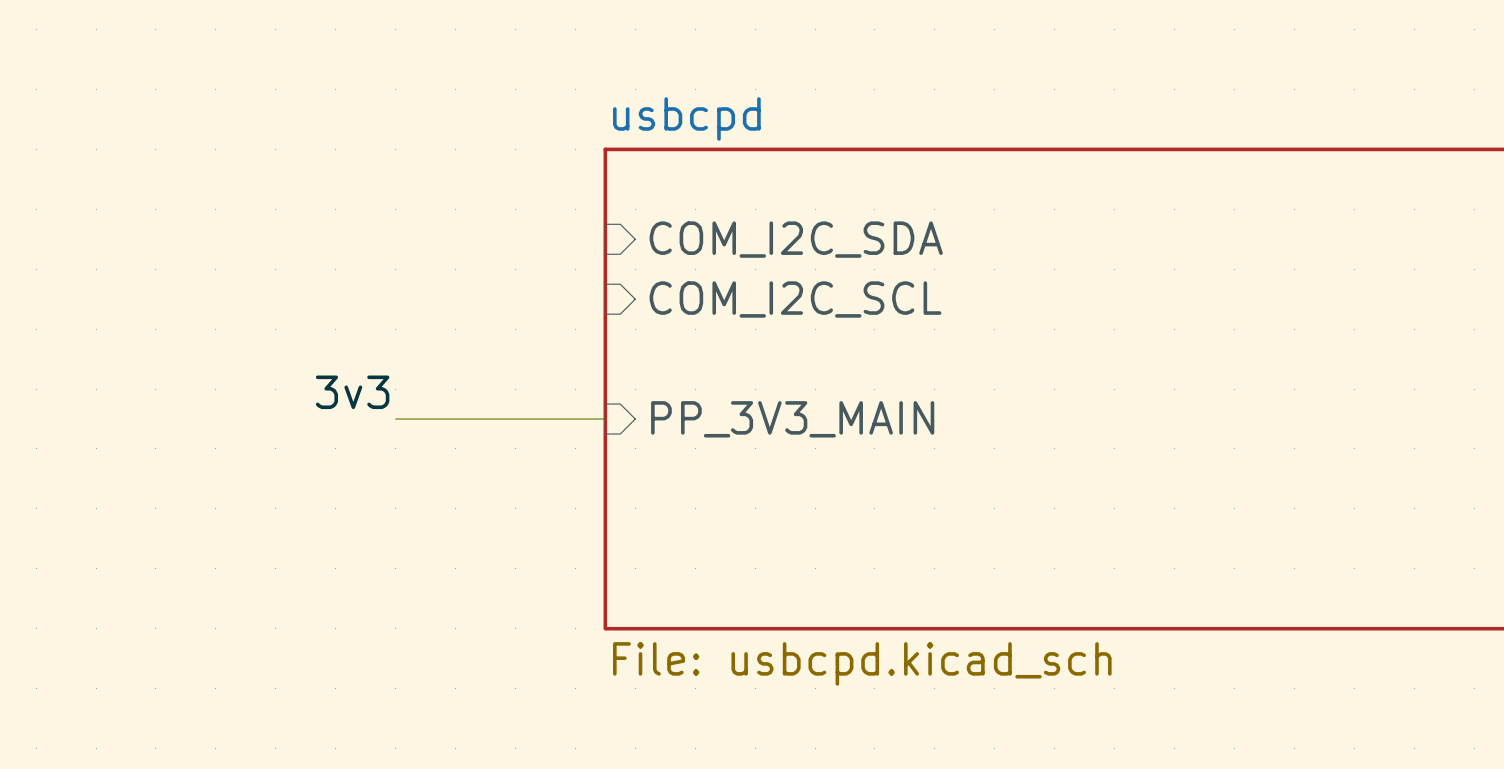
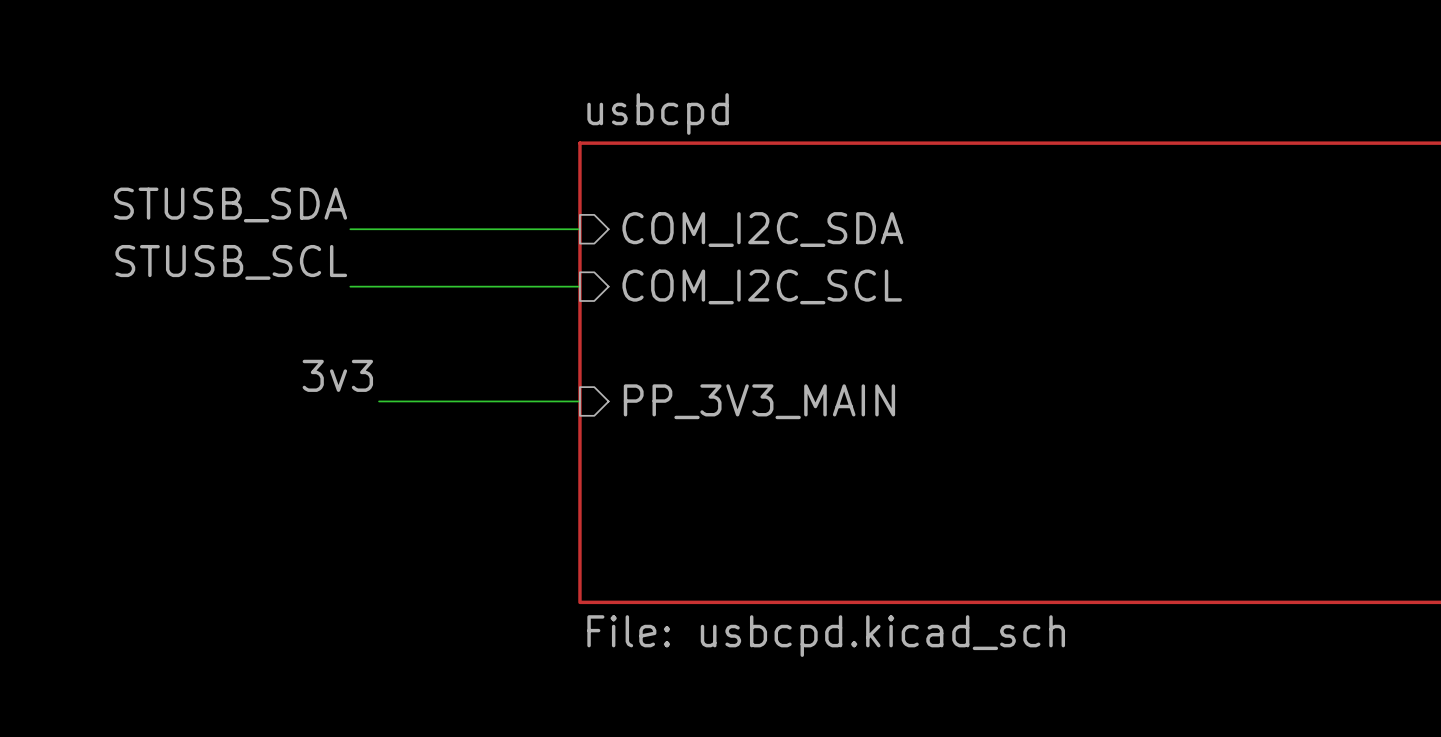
label: none -> STUSB_SDA (230, 205)
wire: none -> (350, 229) (579, 229)
label: none -> STUSB_SCL (231, 262)
wire: none -> (350, 286) (579, 286)

